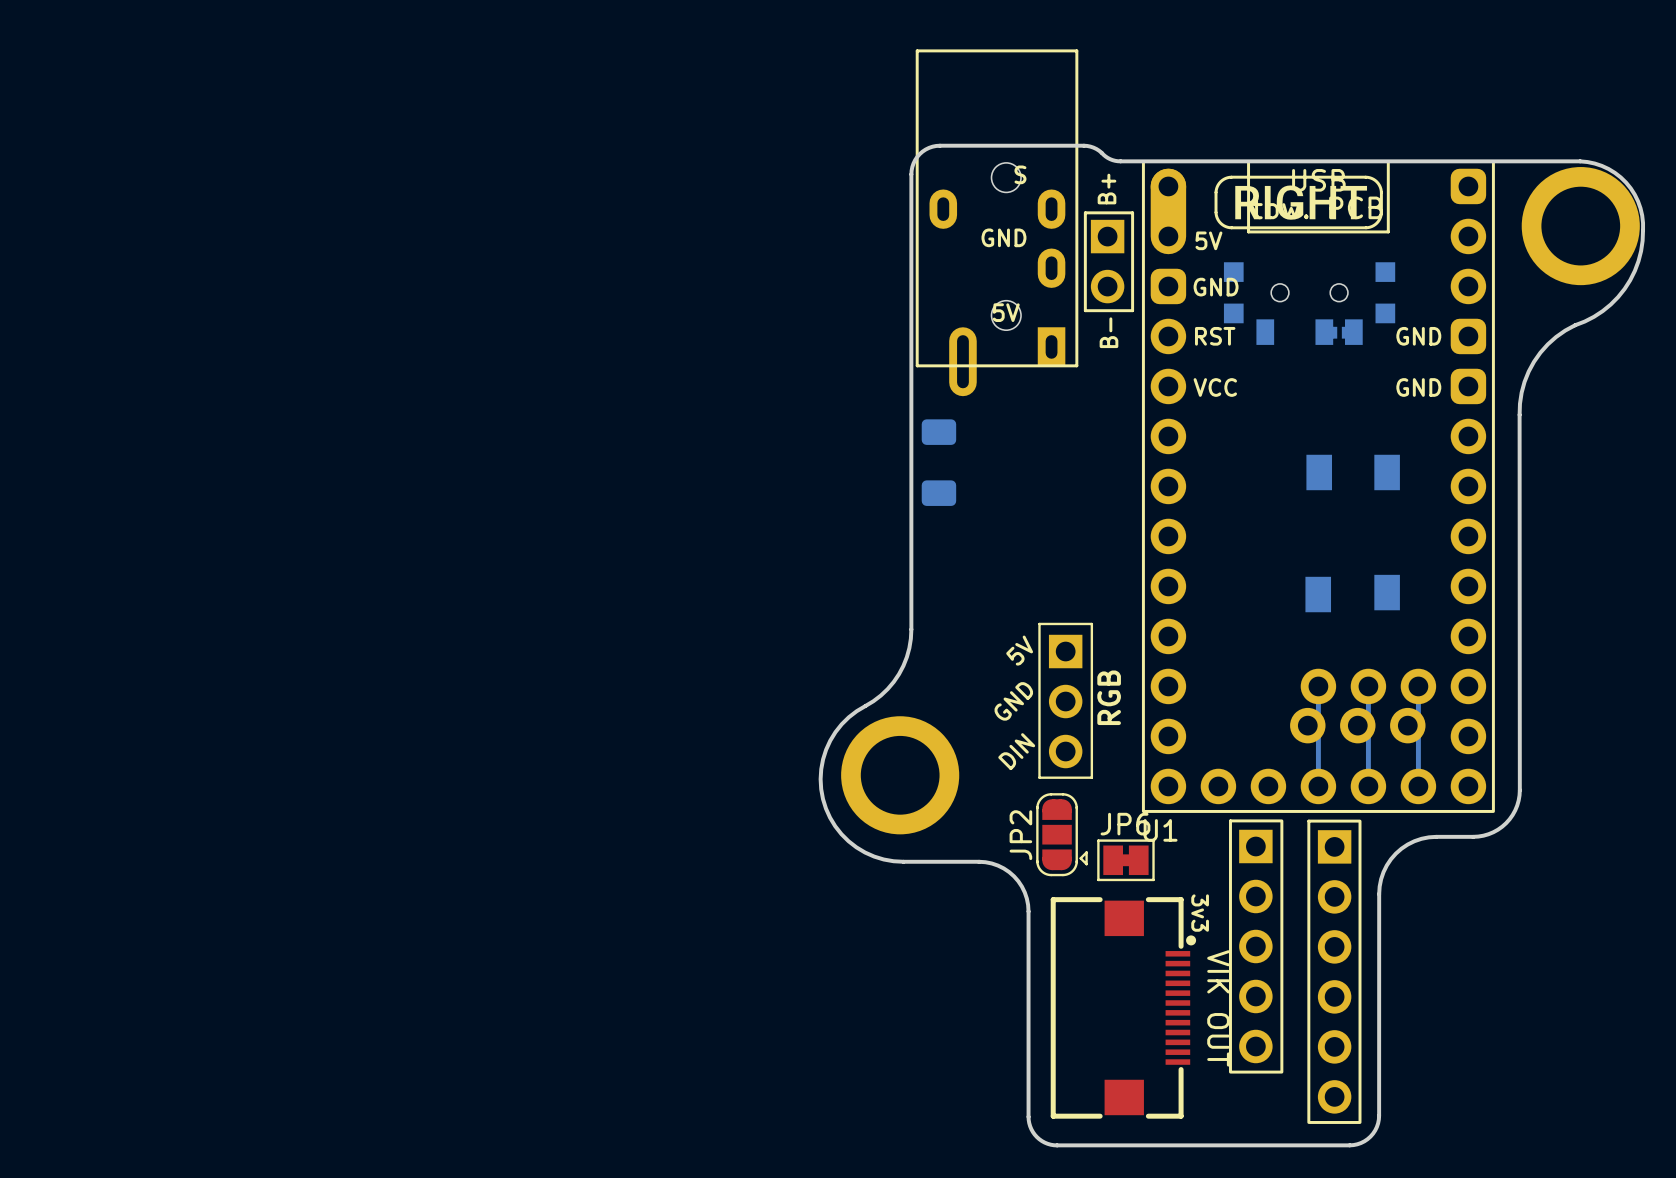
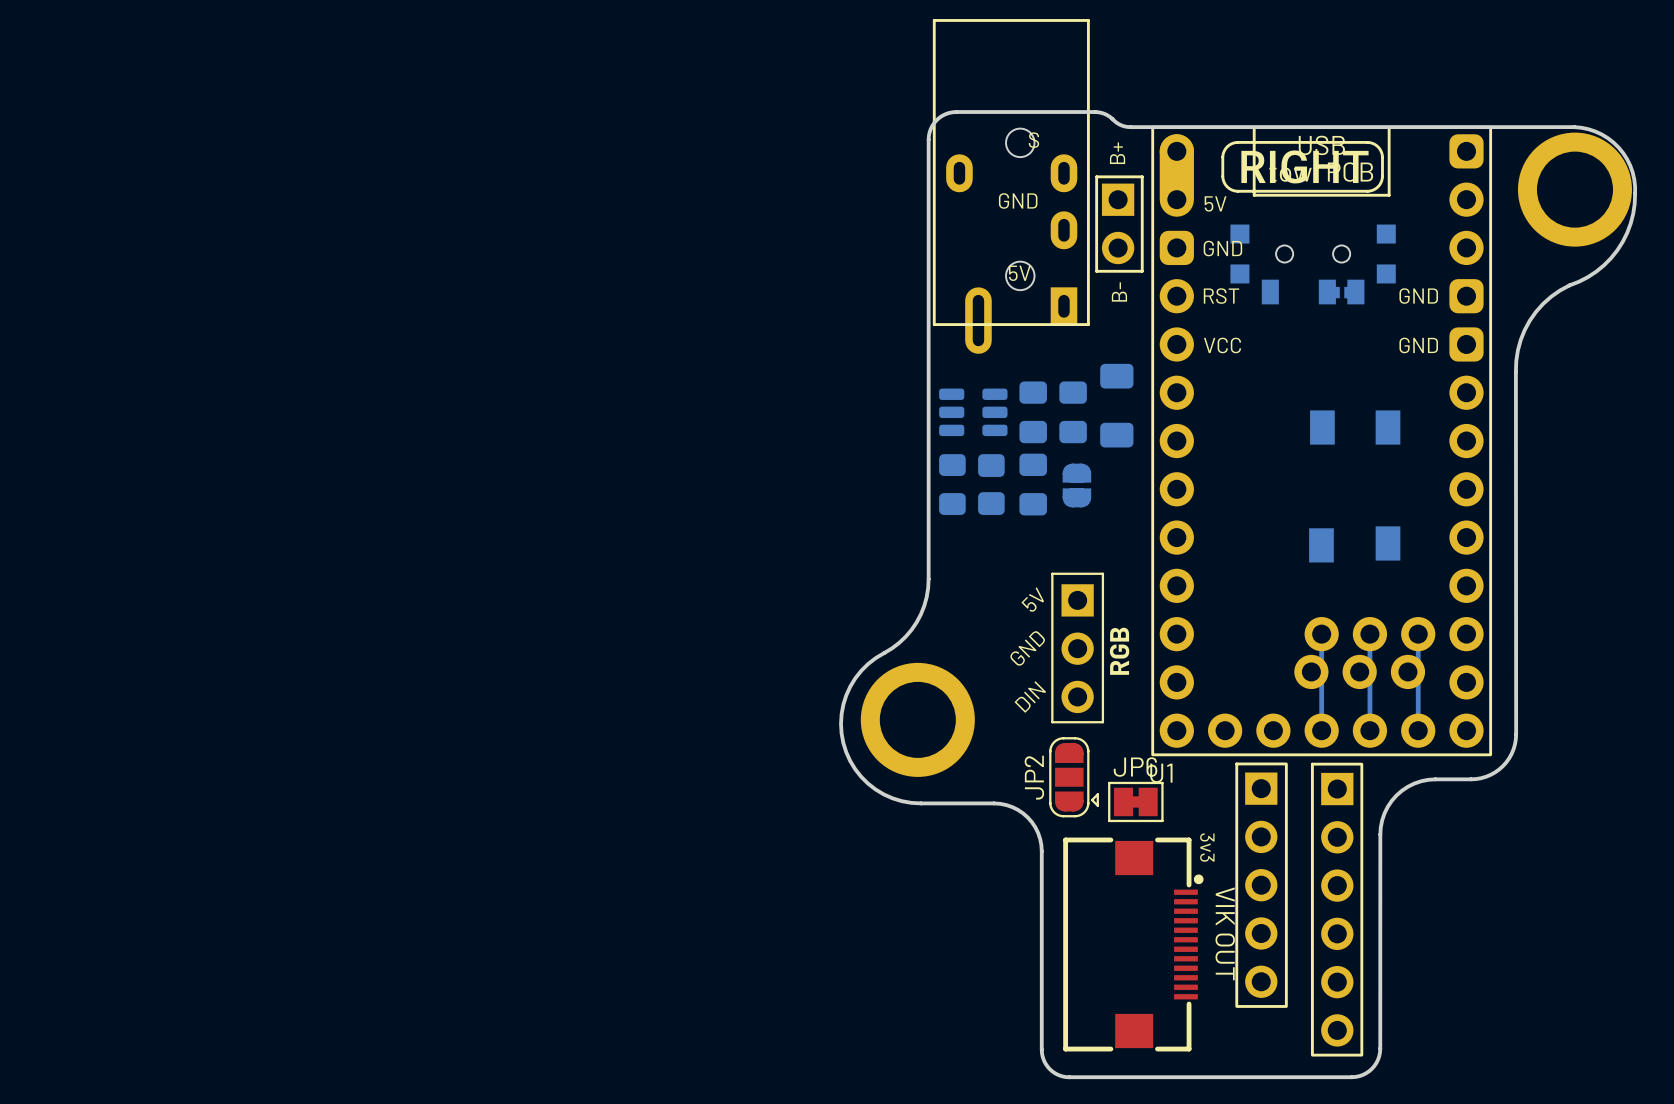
part footprint: [921, 419, 957, 506] -> [939, 388, 1008, 437]
part: none -> (1116, 405)
part: none -> (1033, 412)
part: none -> (1073, 412)
part: none -> (952, 484)
part: none -> (991, 484)
part: none -> (1033, 484)
part: none -> (1076, 485)

